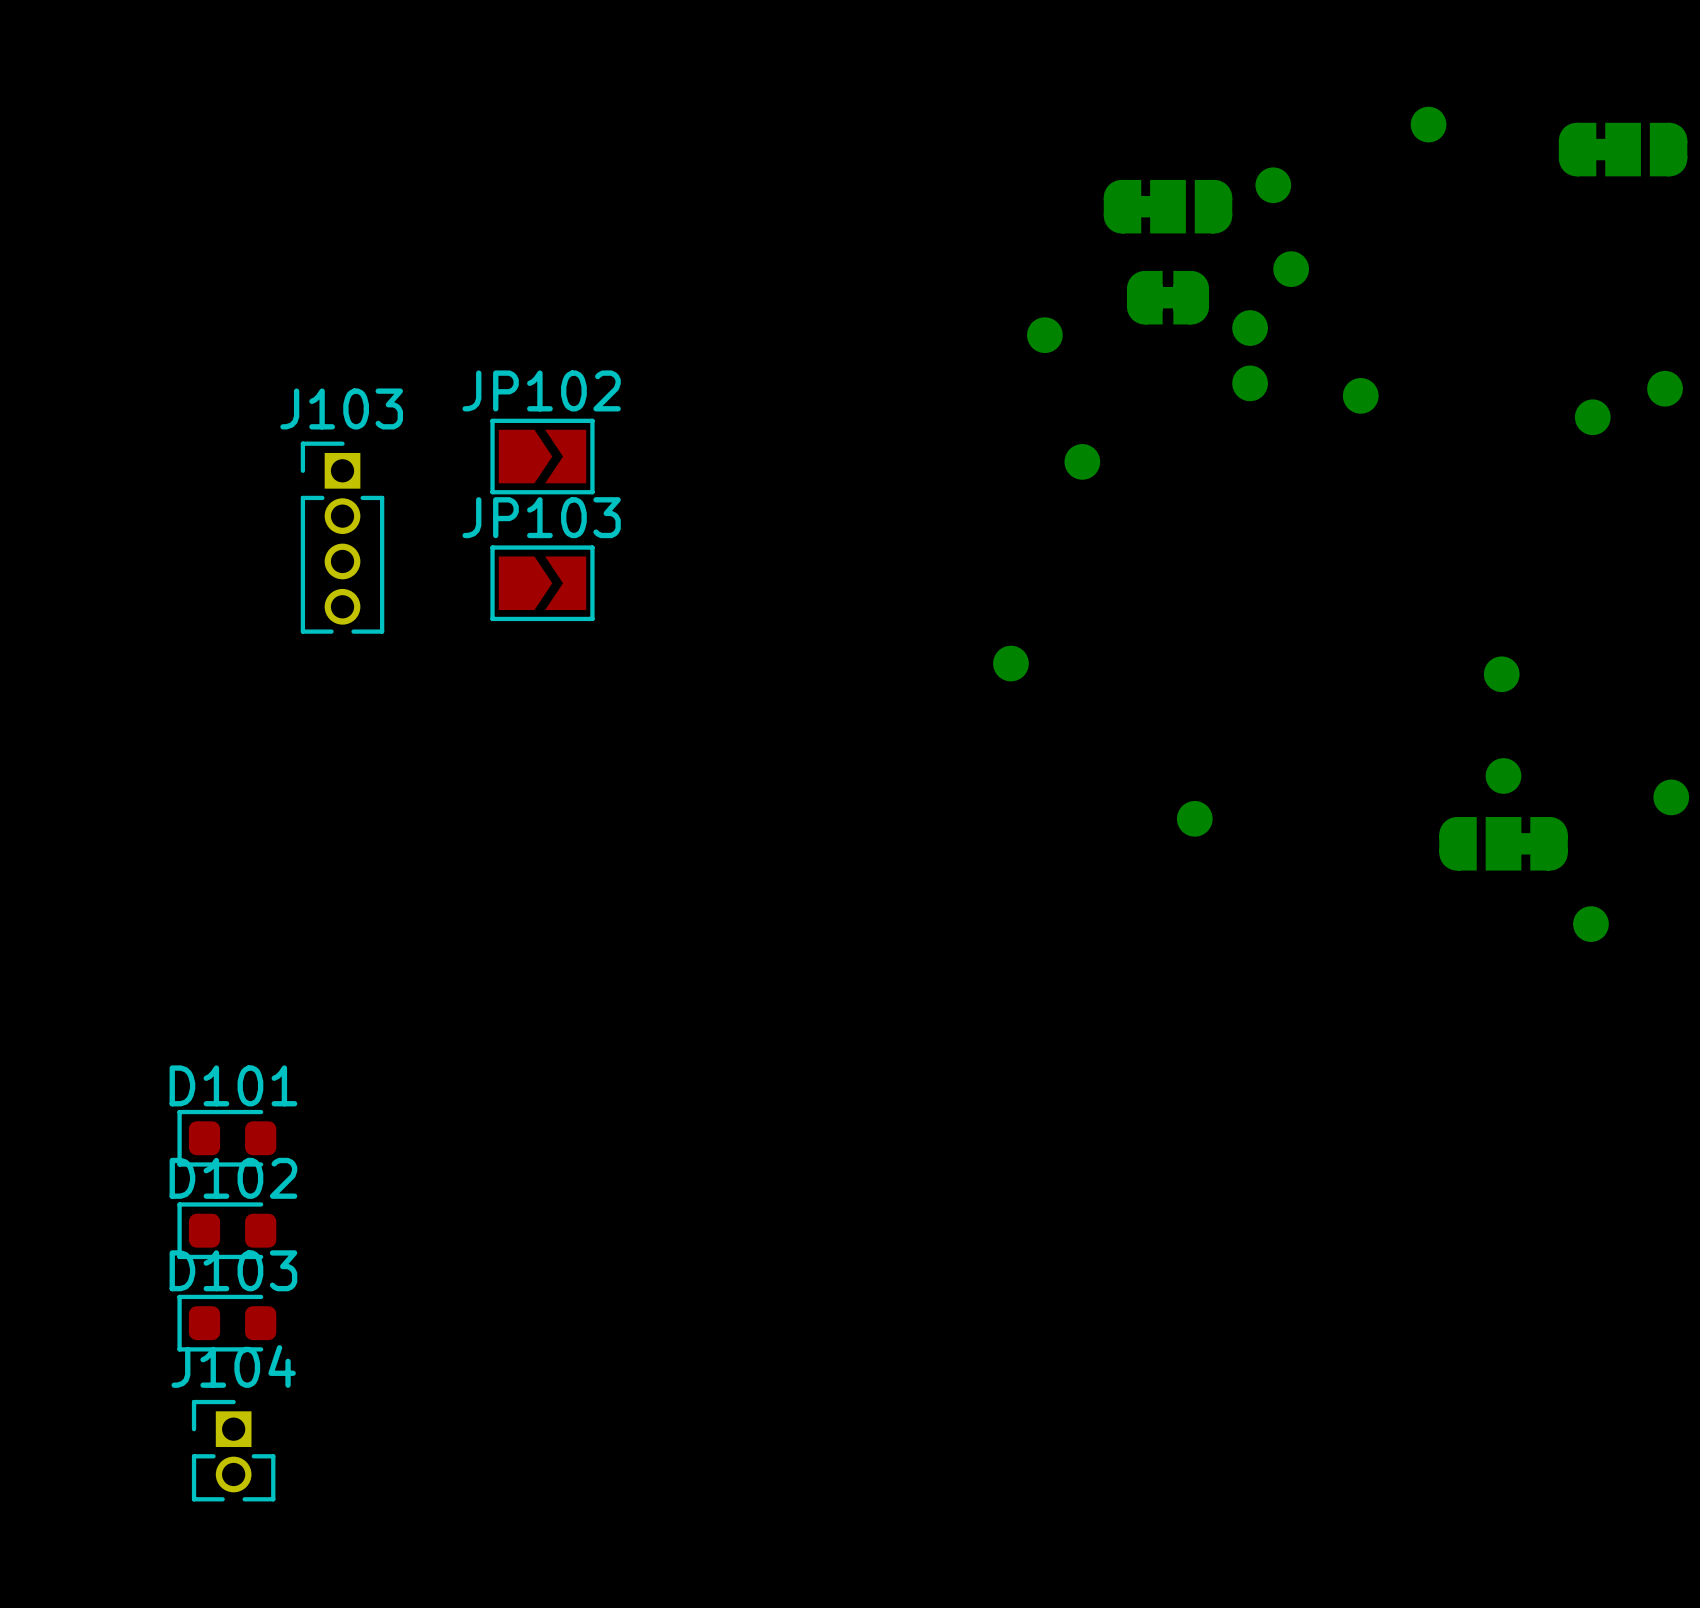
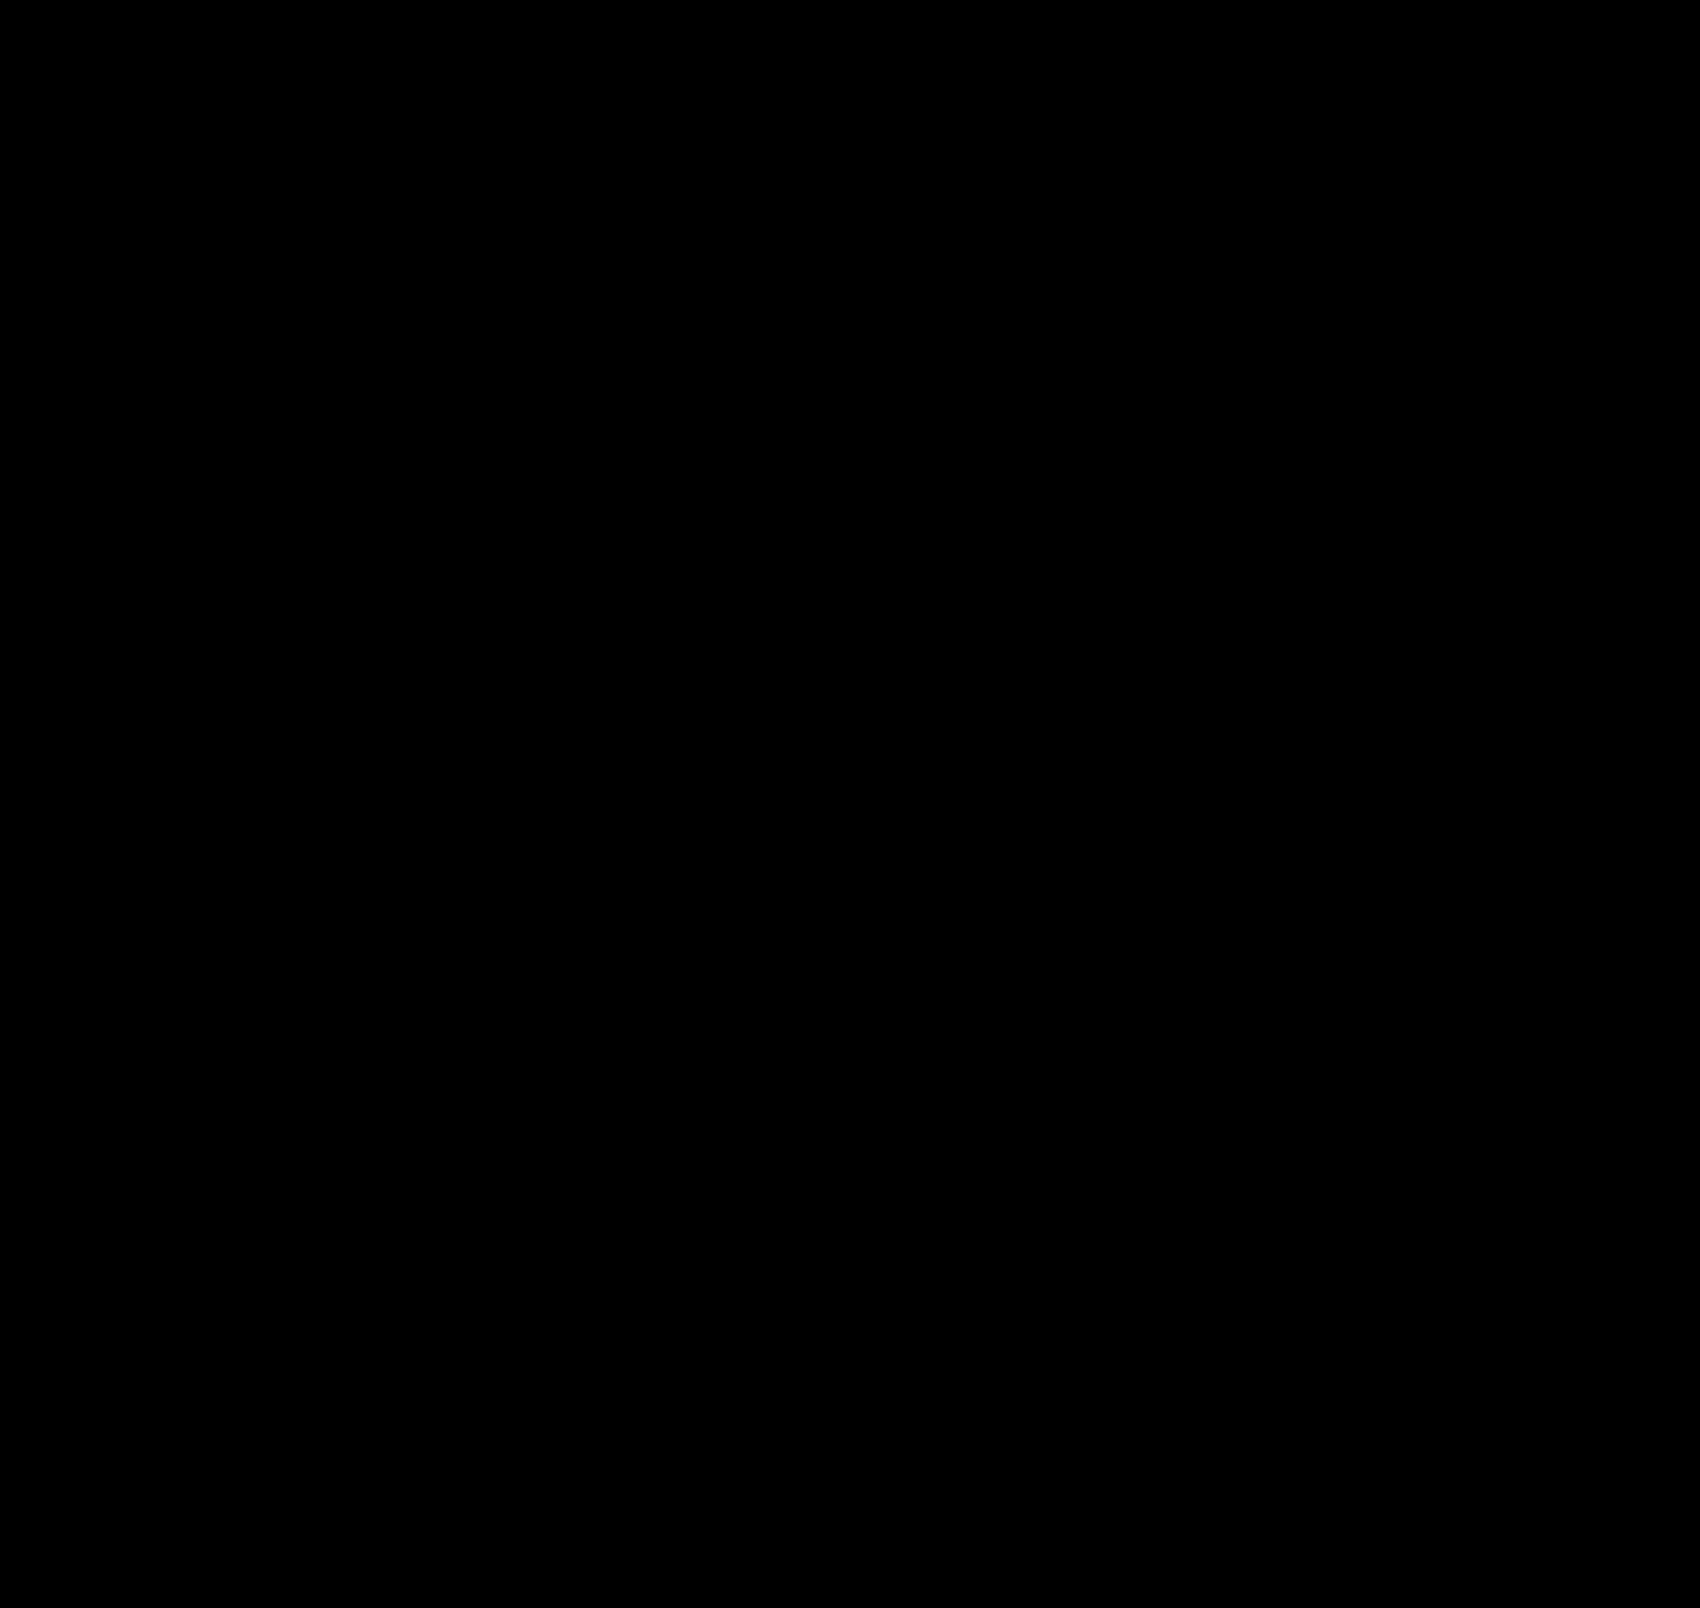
part: (1428, 124) -> none
part: (1623, 149) -> none
part: (1273, 185) -> none
part: (1168, 206) -> none
part: (1291, 269) -> none
part: (1168, 297) -> none
part: (1250, 328) -> none
part: (1044, 335) -> none
part: (1250, 383) -> none
part: (1665, 388) -> none
part: (1360, 395) -> none
part: (1592, 417) -> none
JP102: (542, 456) -> none
part: (1082, 461) -> none
J103: (342, 537) -> none
JP103: (542, 583) -> none
part: (1010, 663) -> none
part: (1501, 674) -> none
part: (1503, 775) -> none
part: (1671, 797) -> none
part: (1194, 818) -> none
part: (1503, 843) -> none
part: (1590, 924) -> none
D101: (226, 1138) -> none
D102: (226, 1230) -> none
D103: (226, 1323) -> none
J104: (233, 1450) -> none

